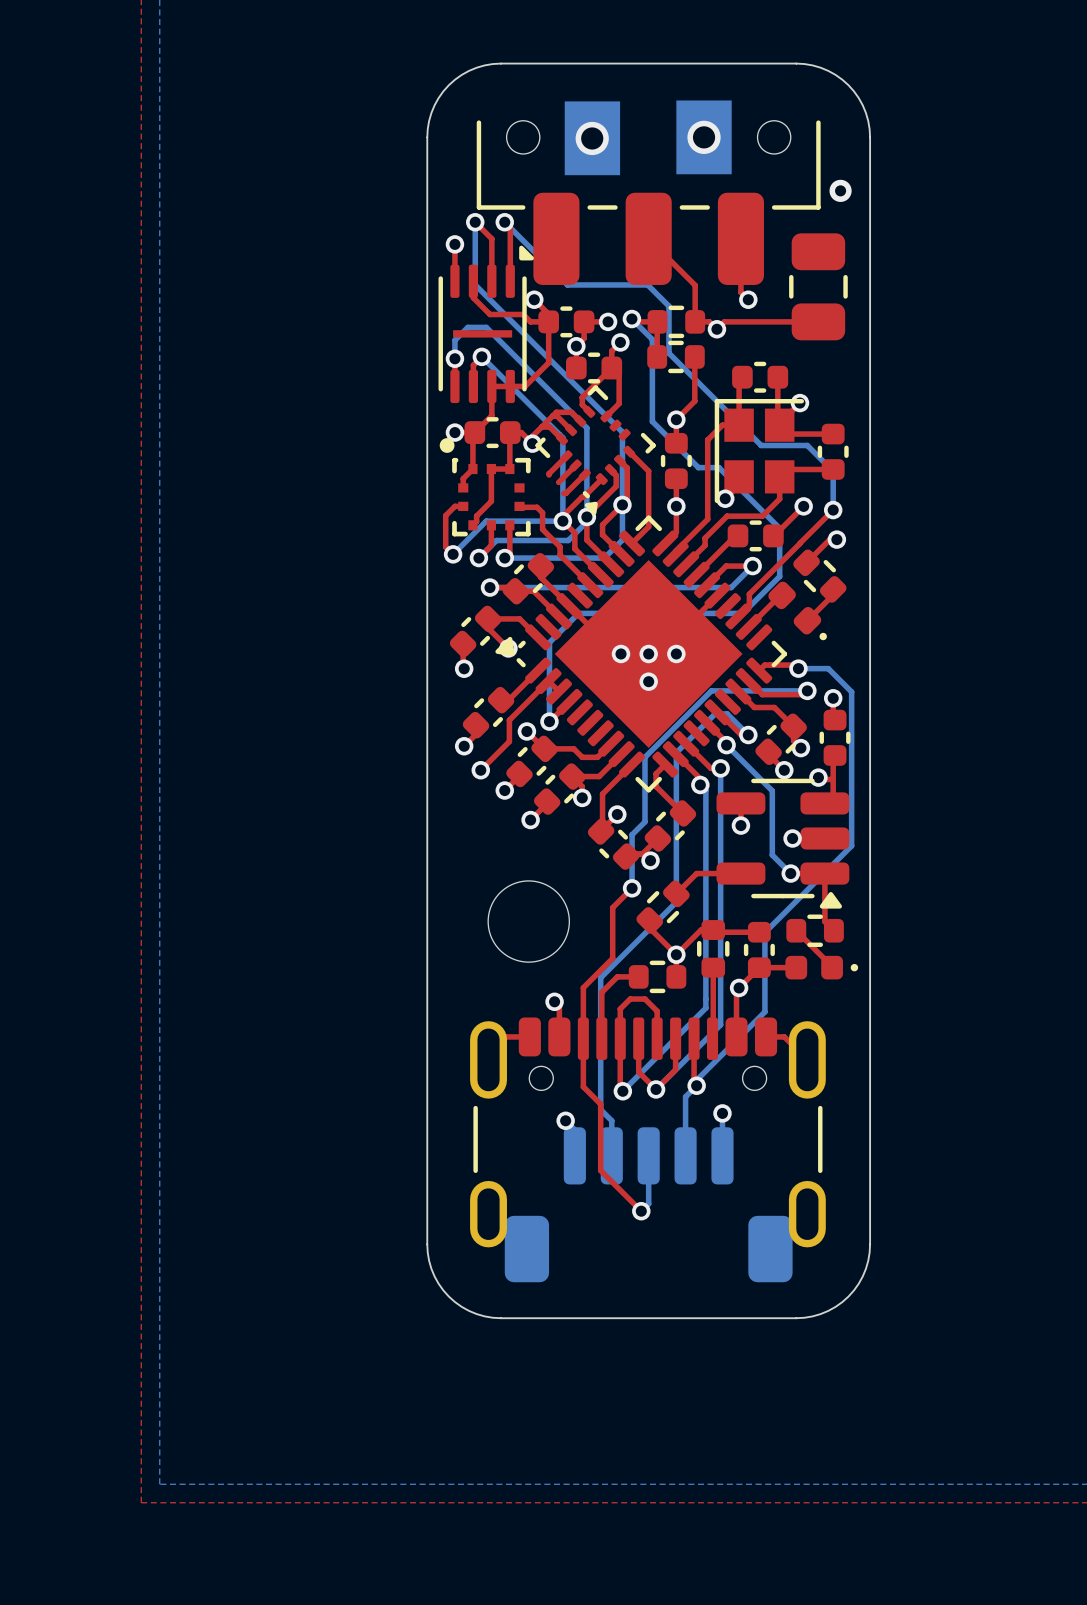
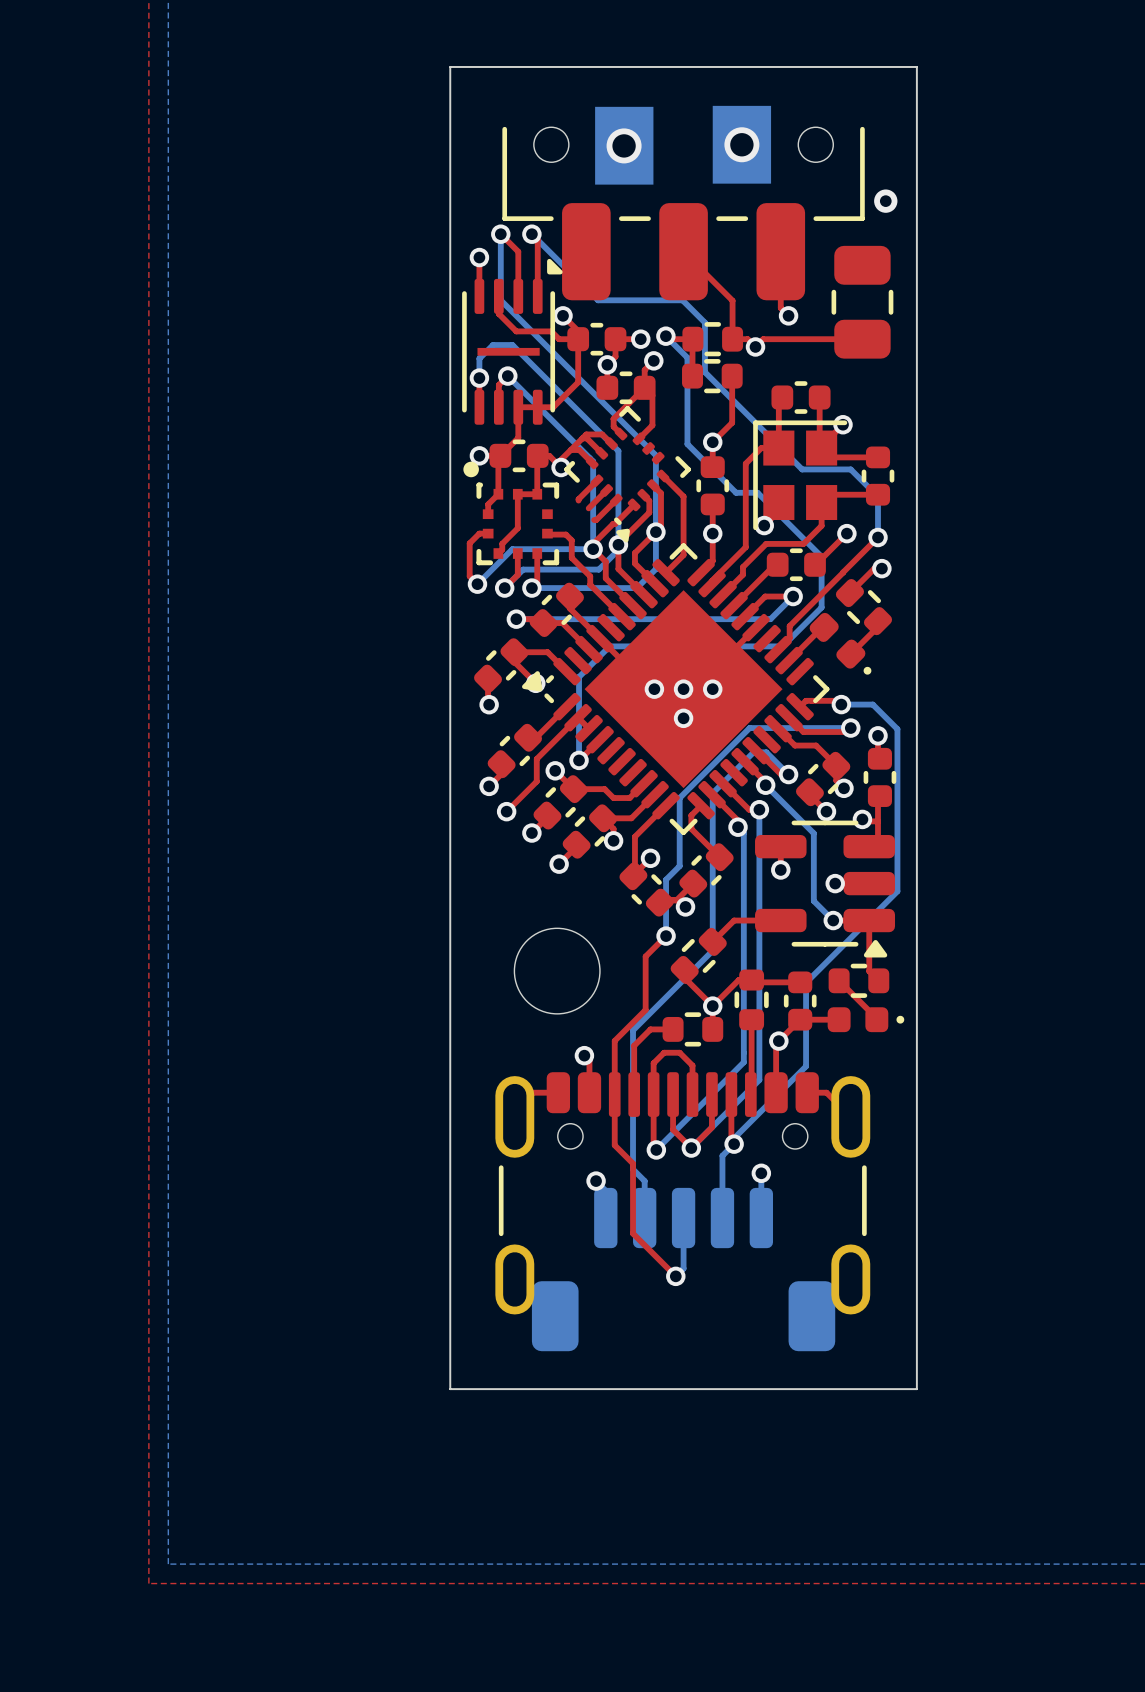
board edge: (501, 63) (476, 67) (461, 74) (448, 85) (438, 98) (431, 112) (427, 137) -> (528, 66) (450, 66) (450, 144)
board edge: (796, 63) (820, 67) (835, 74) (848, 85) (858, 98) (865, 112) (870, 137) -> (839, 66) (916, 66) (916, 144)
board edge: (427, 1244) (429, 1260) (434, 1276) (448, 1296) (461, 1306) (476, 1314) (501, 1318) -> (450, 1311) (450, 1389) (528, 1389)
board edge: (870, 1244) (868, 1260) (862, 1276) (848, 1296) (828, 1310) (812, 1316) (796, 1318) -> (916, 1311) (916, 1389) (839, 1389)

